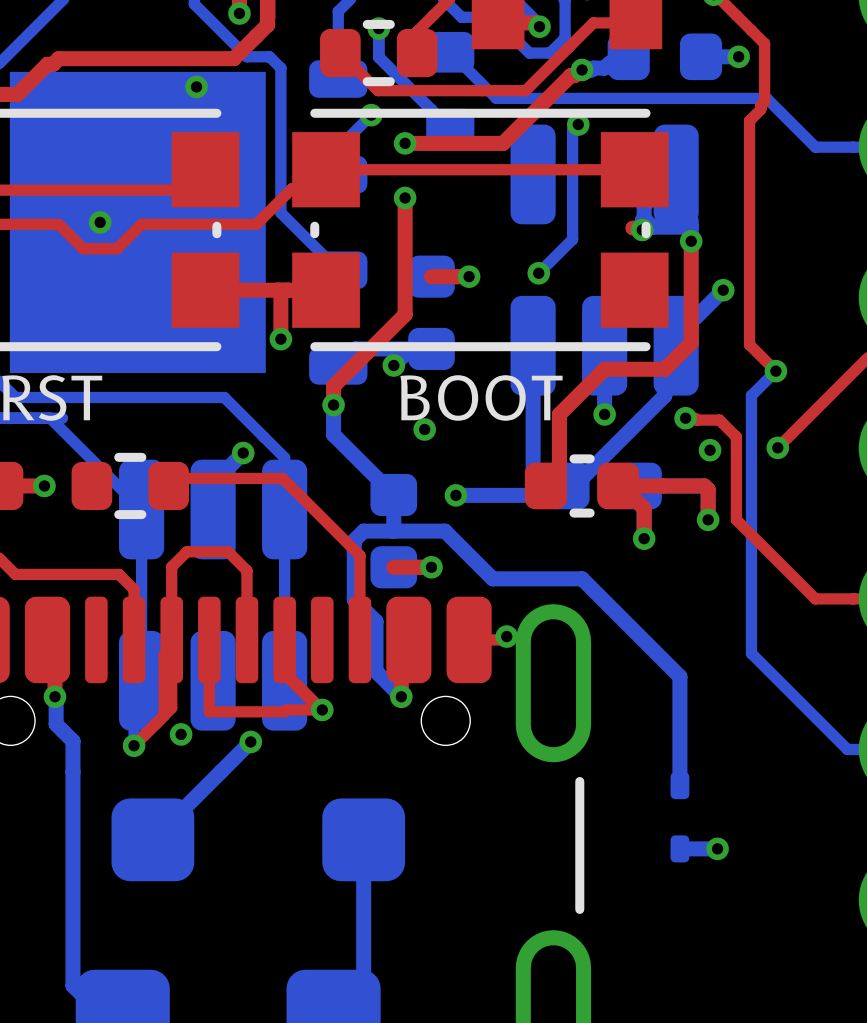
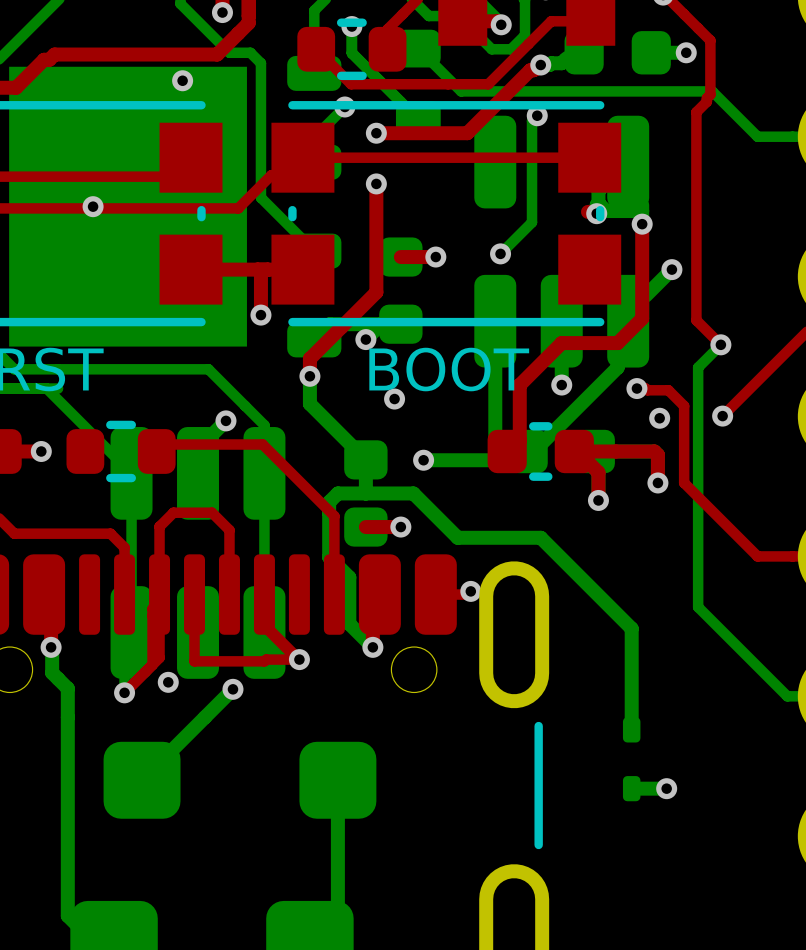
top track: (58, 224) (83, 248) (117, 248) (141, 224) -> (54, 208) (131, 208)

